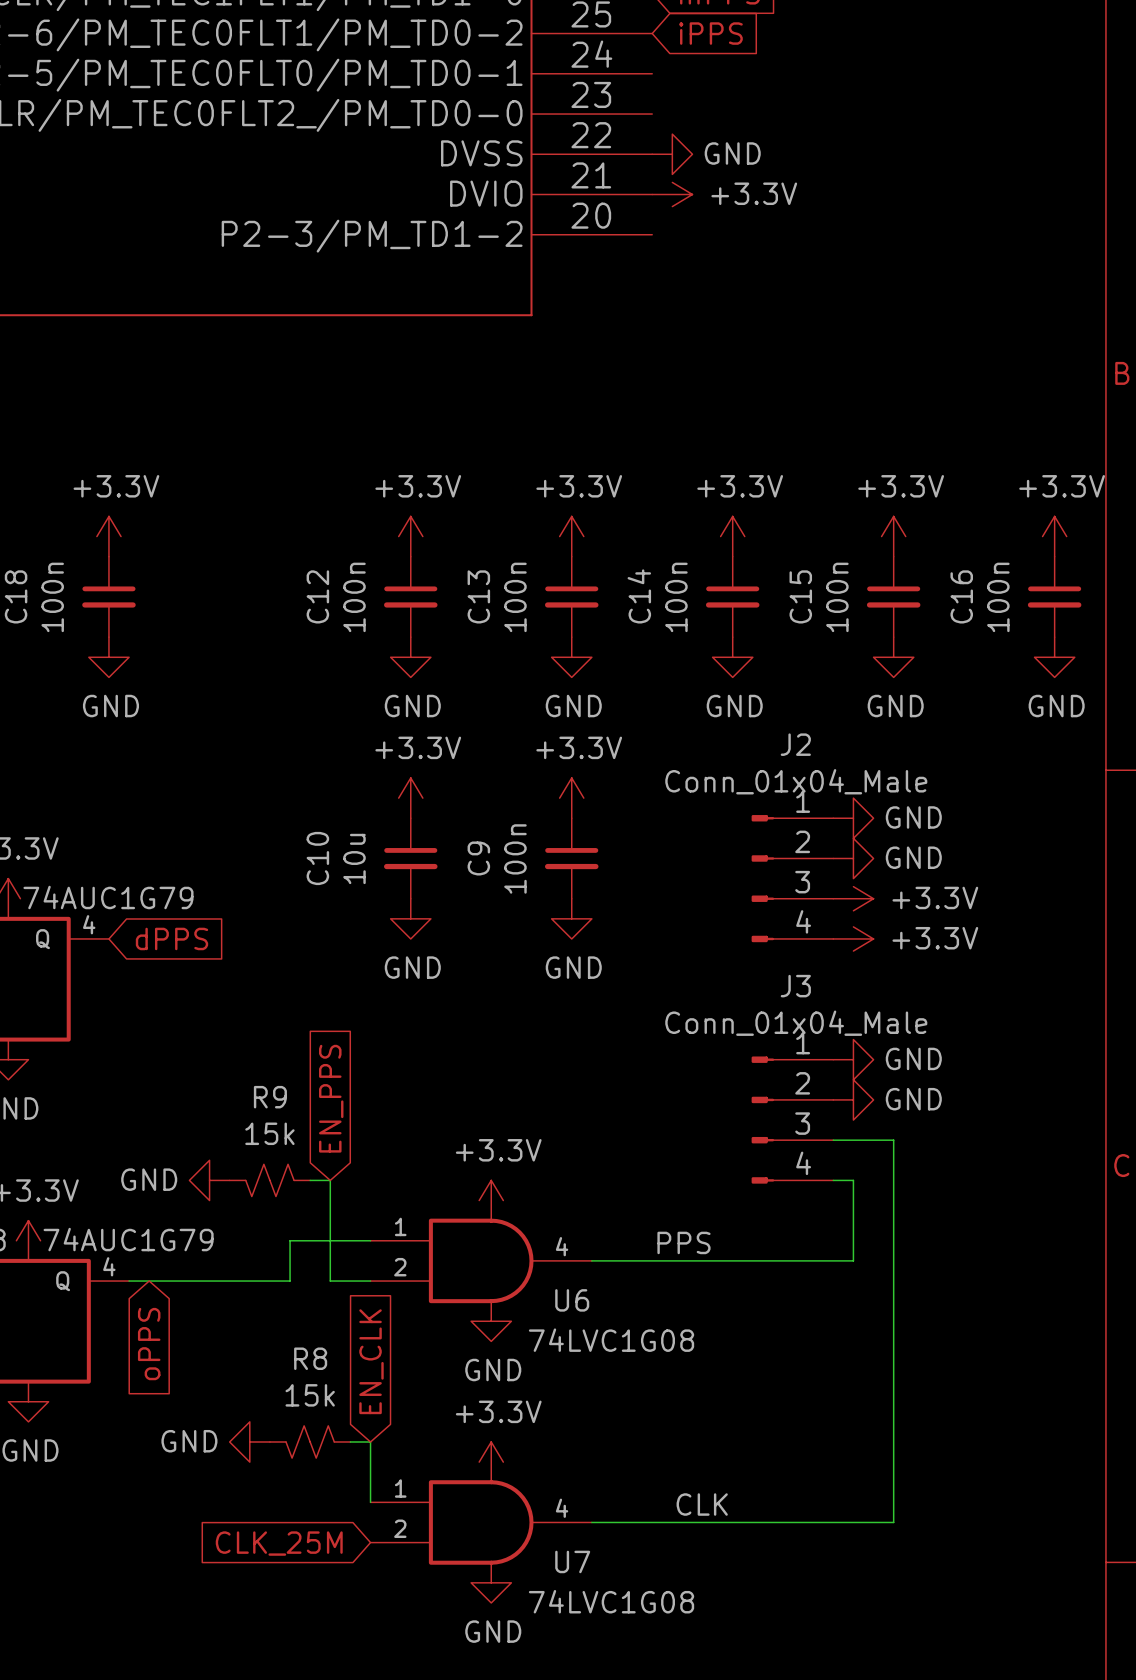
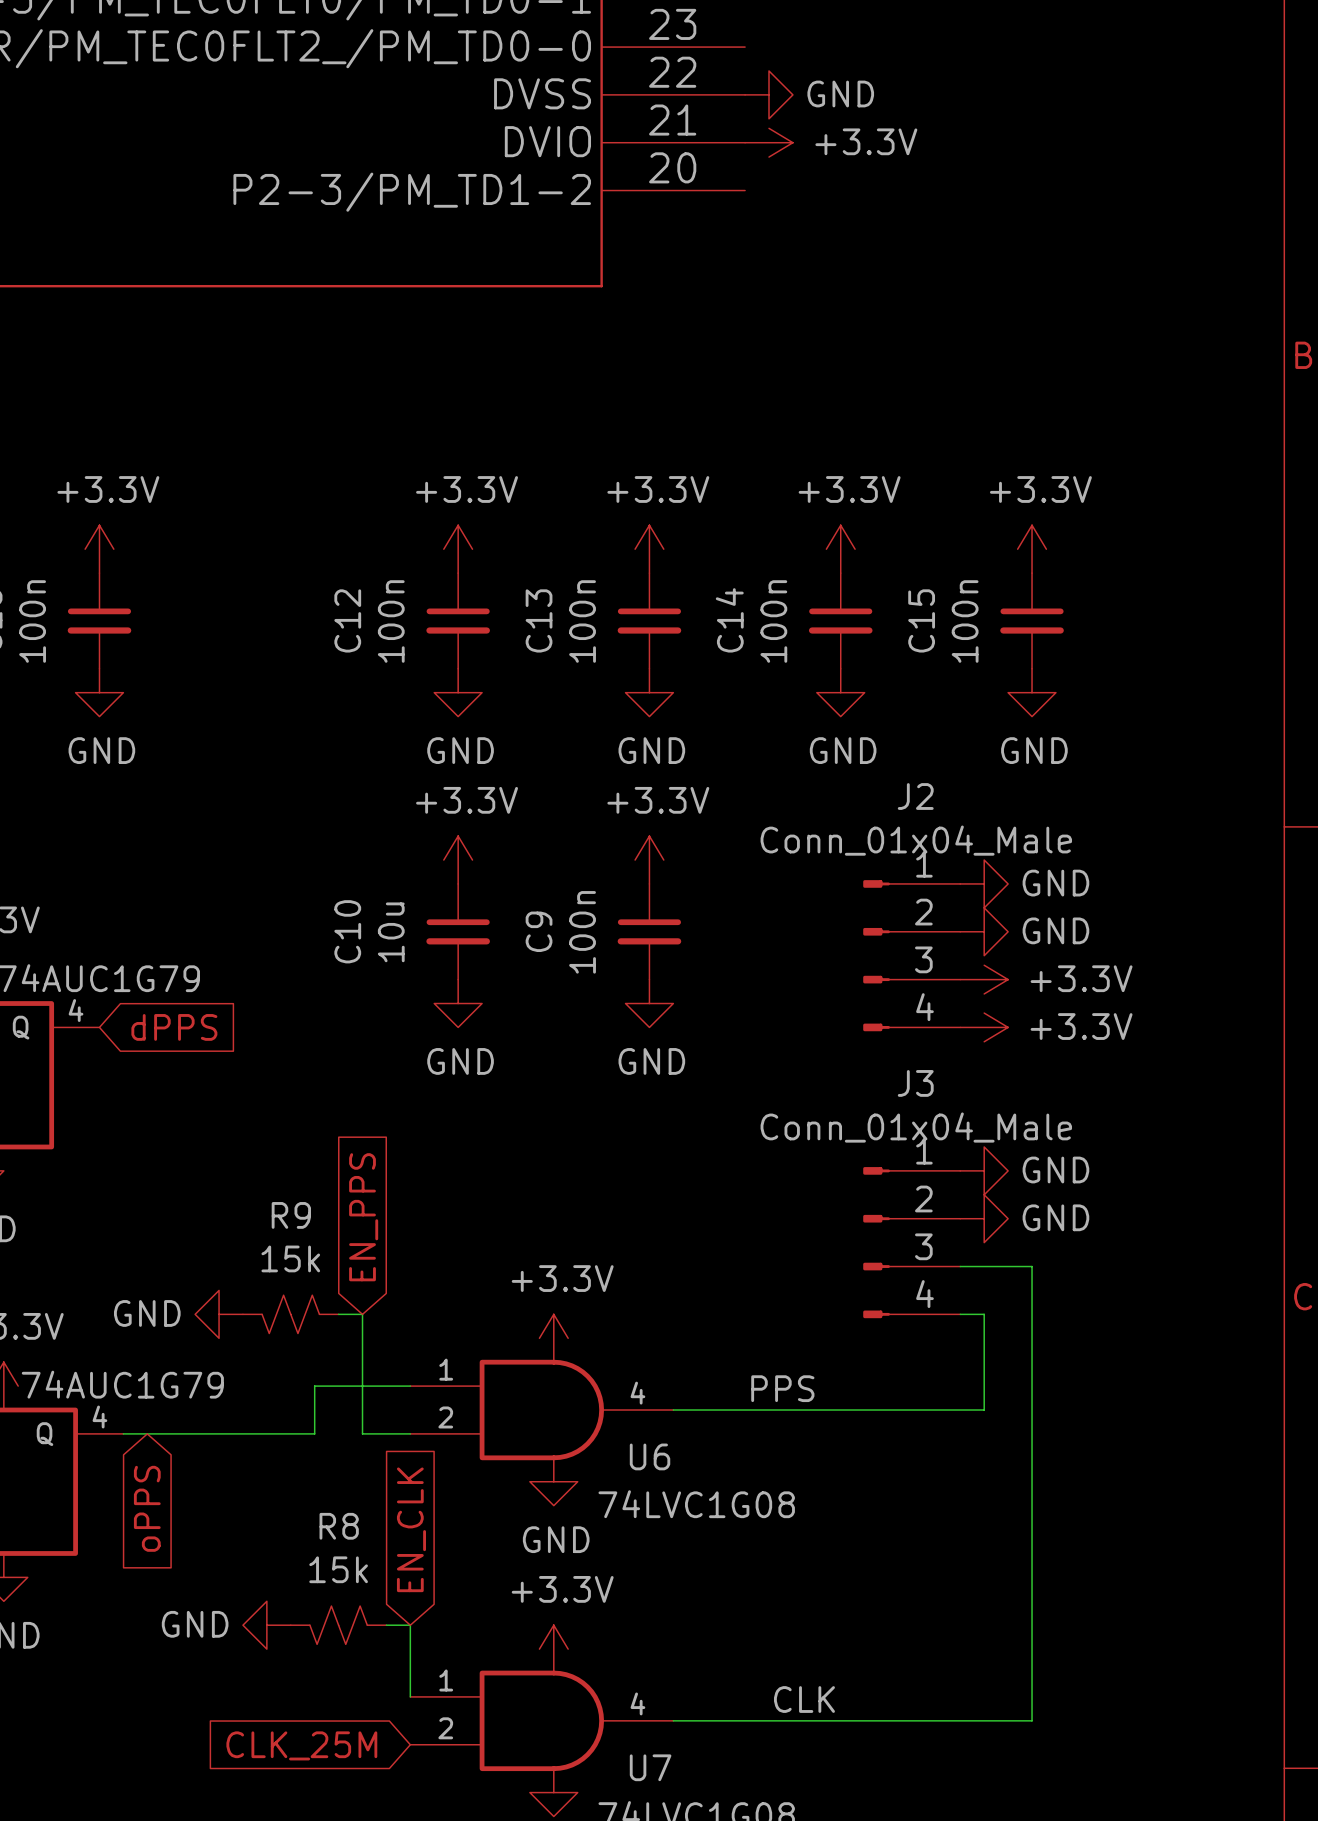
power symbol: +3.3V (1054, 536) -> none
C16: 100n (1054, 596) -> none
power symbol: GND (1054, 657) -> none

